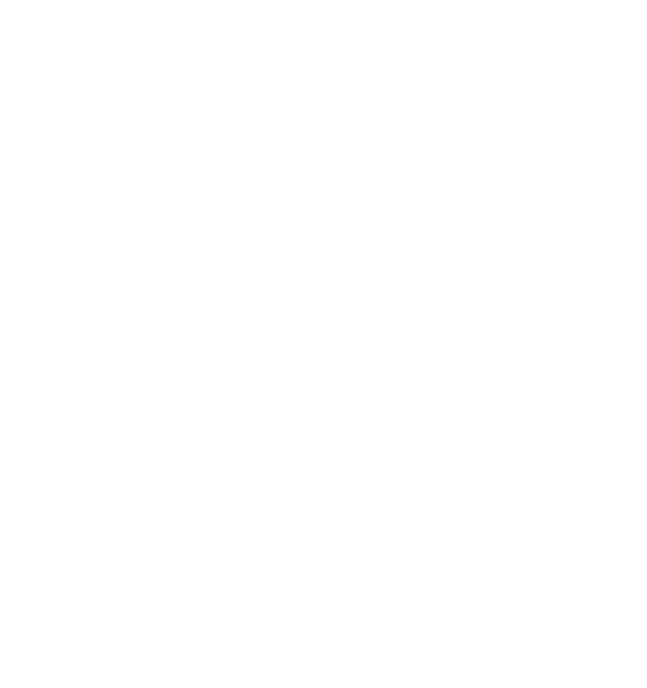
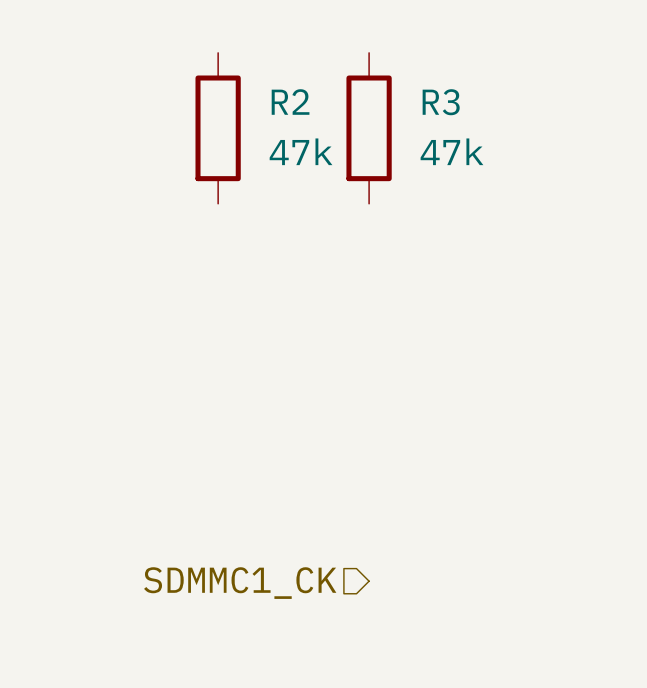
R2: none -> 47k (218, 128)
R3: none -> 47k (369, 128)
hierarchical label: none -> SDMMC1_CK (240, 583)

